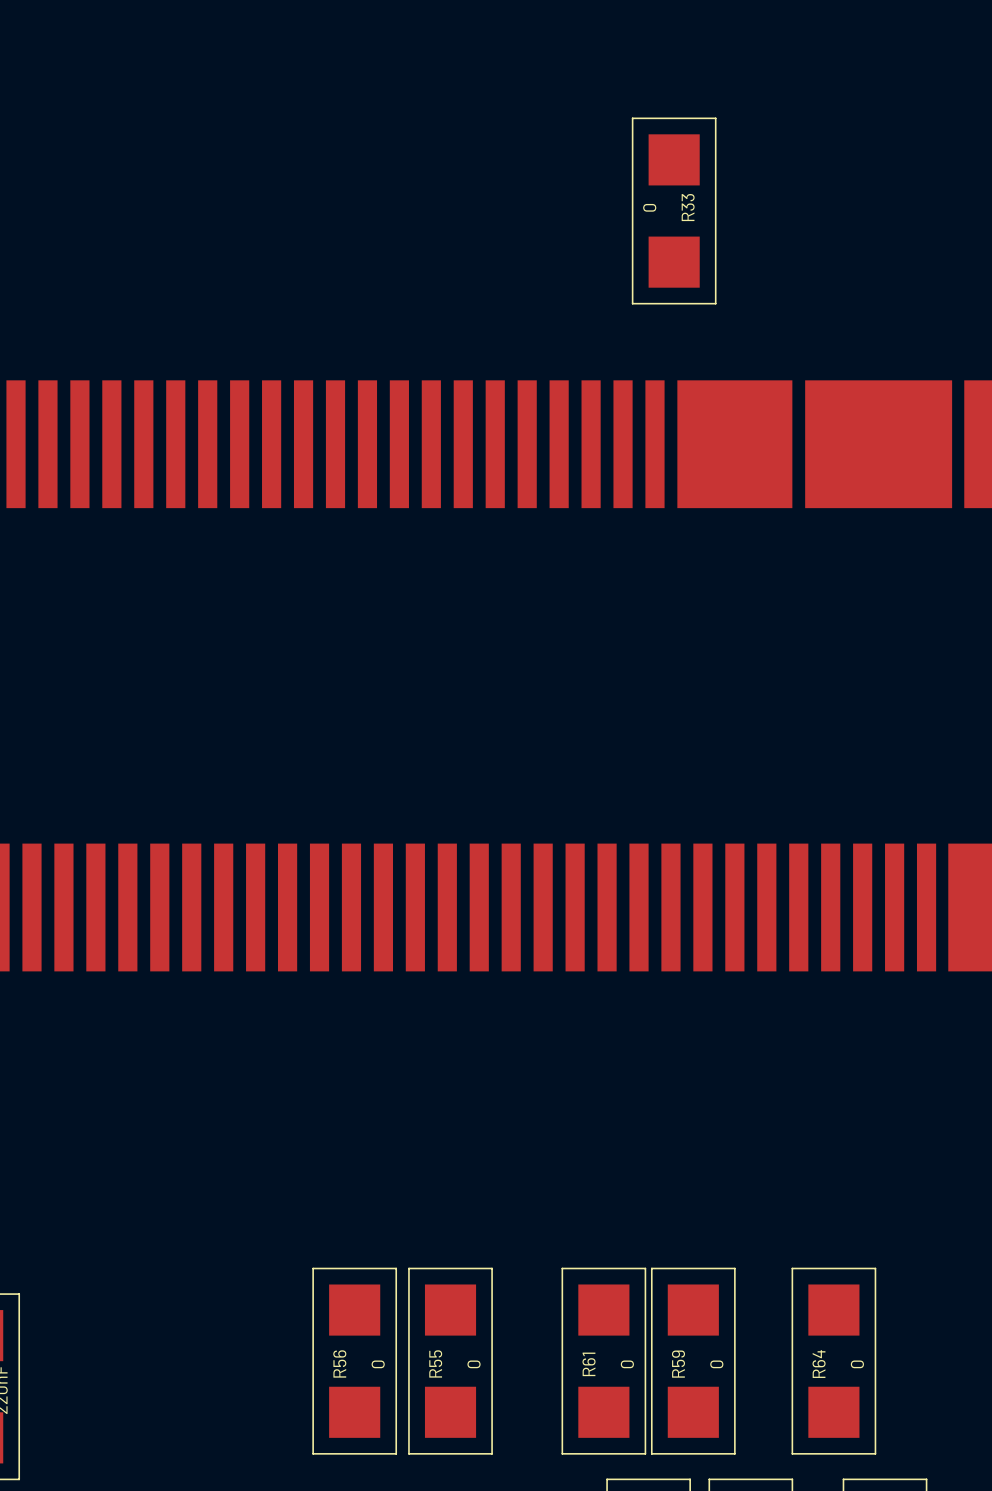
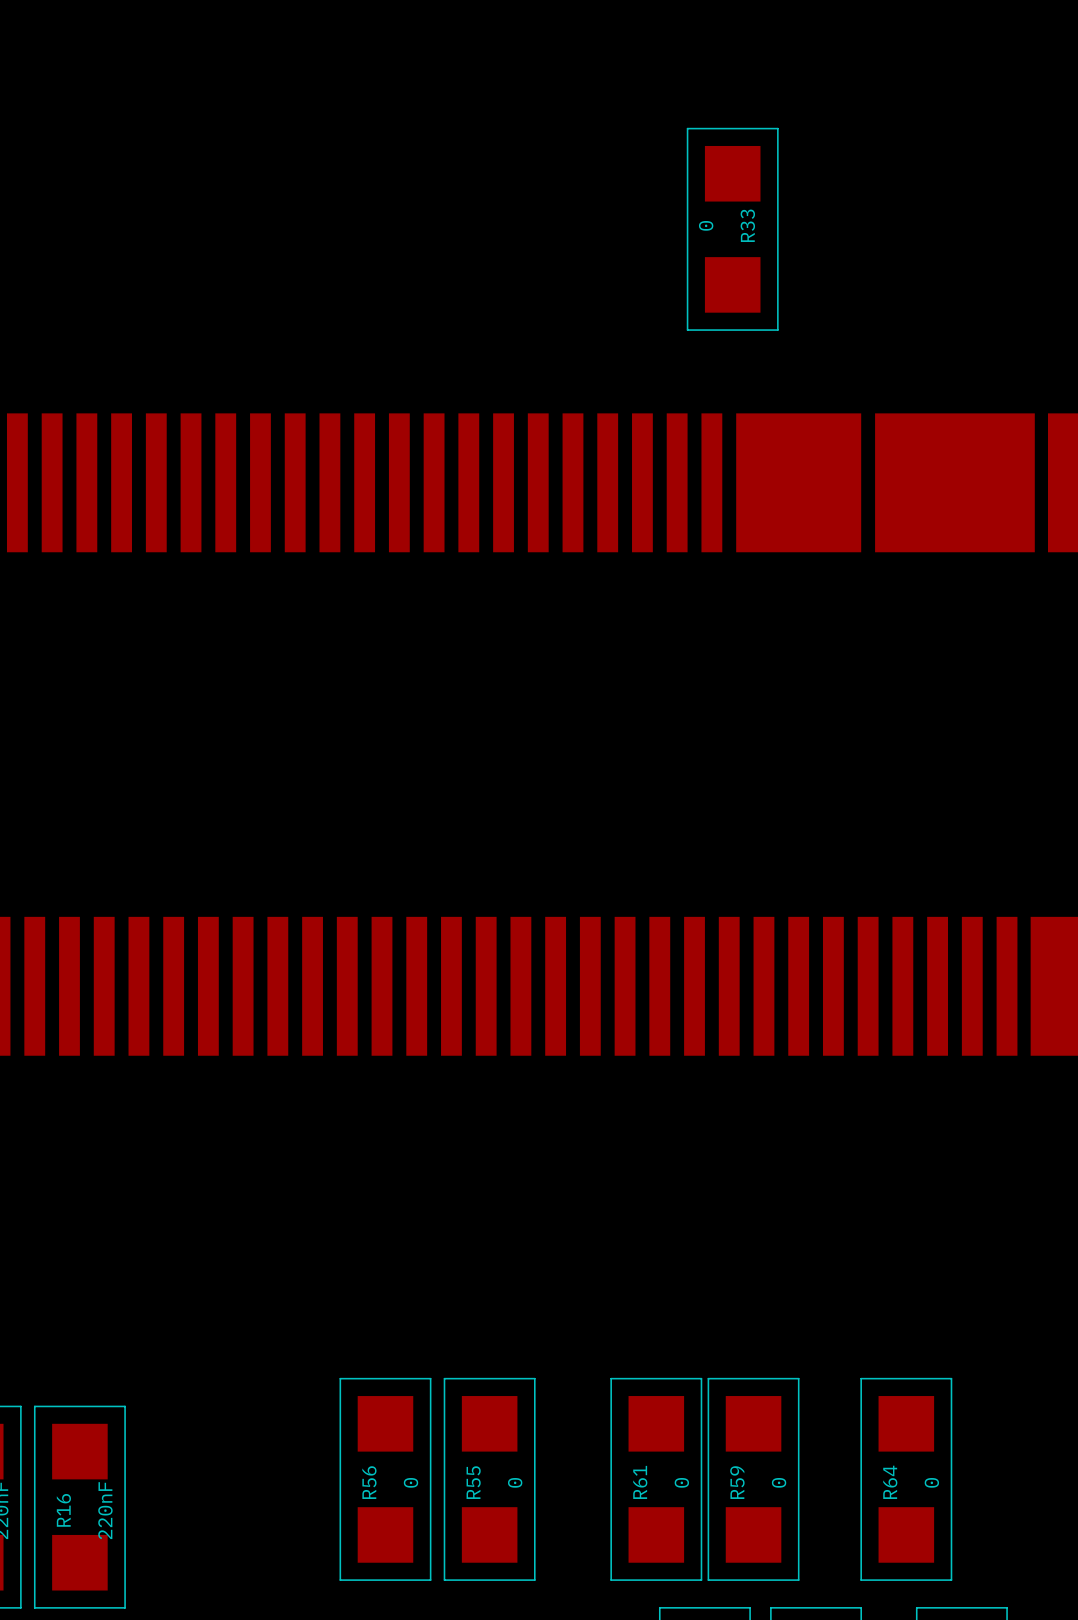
R16: none -> 220nF (79, 1507)

